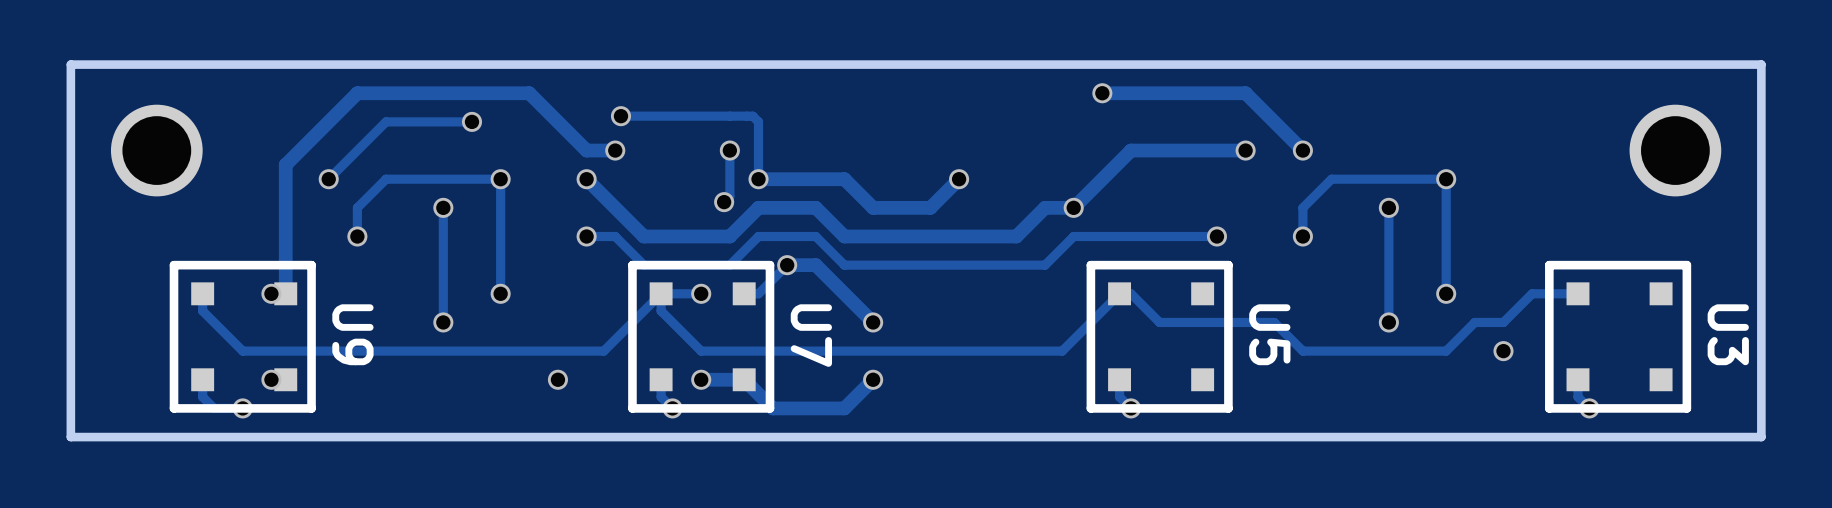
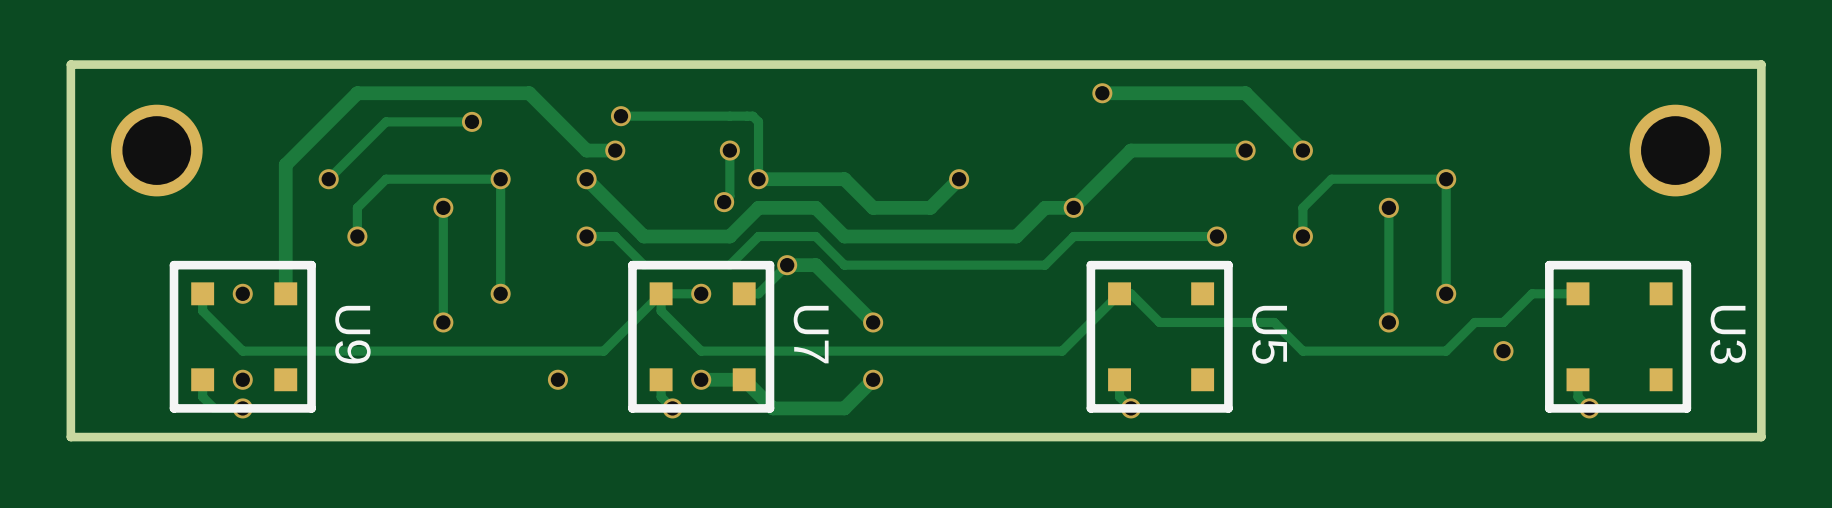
via position: (271, 293) -> (242, 293)
via position: (271, 379) -> (242, 379)

